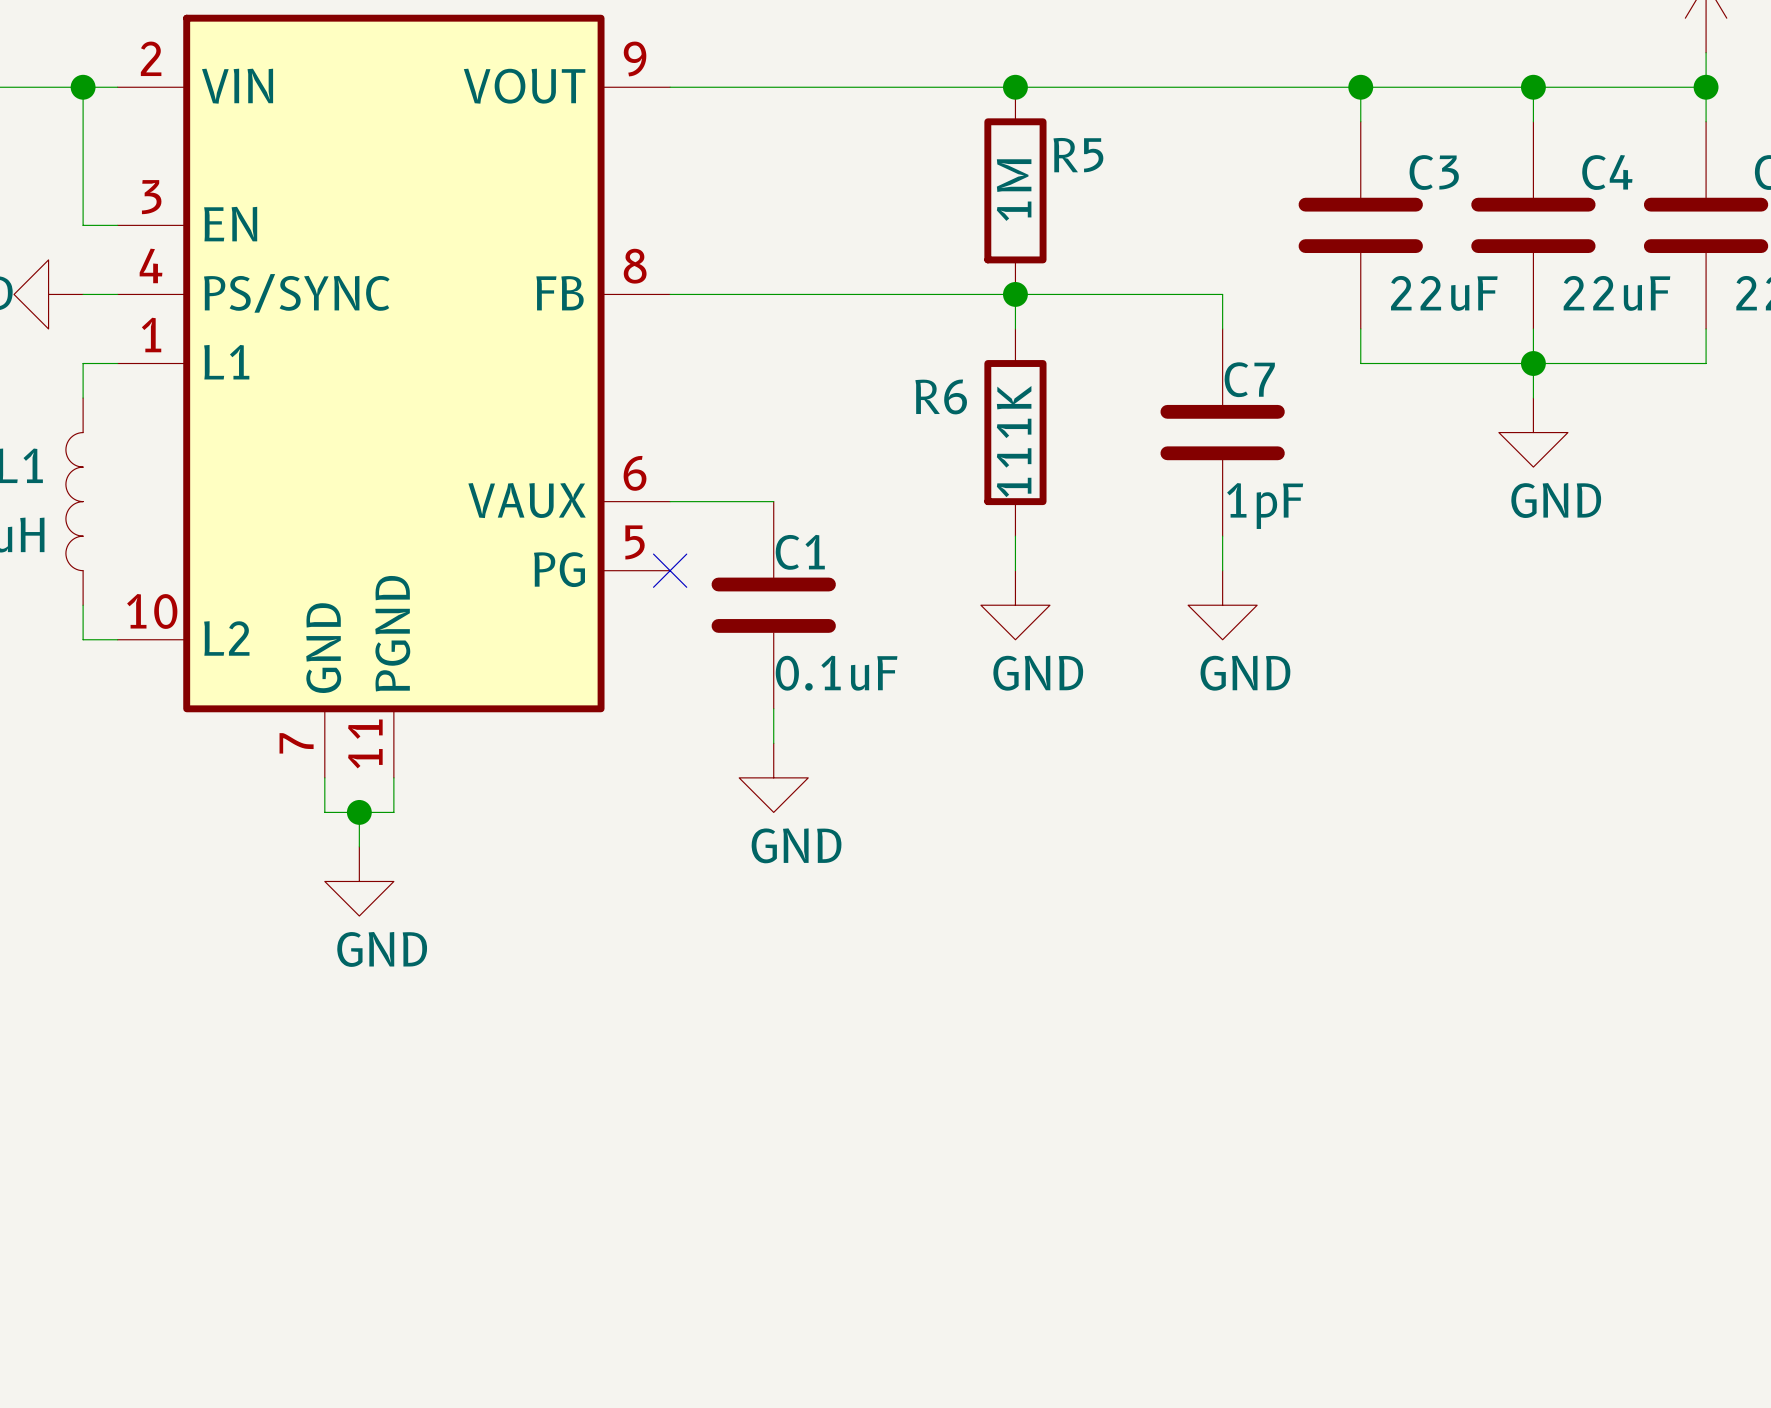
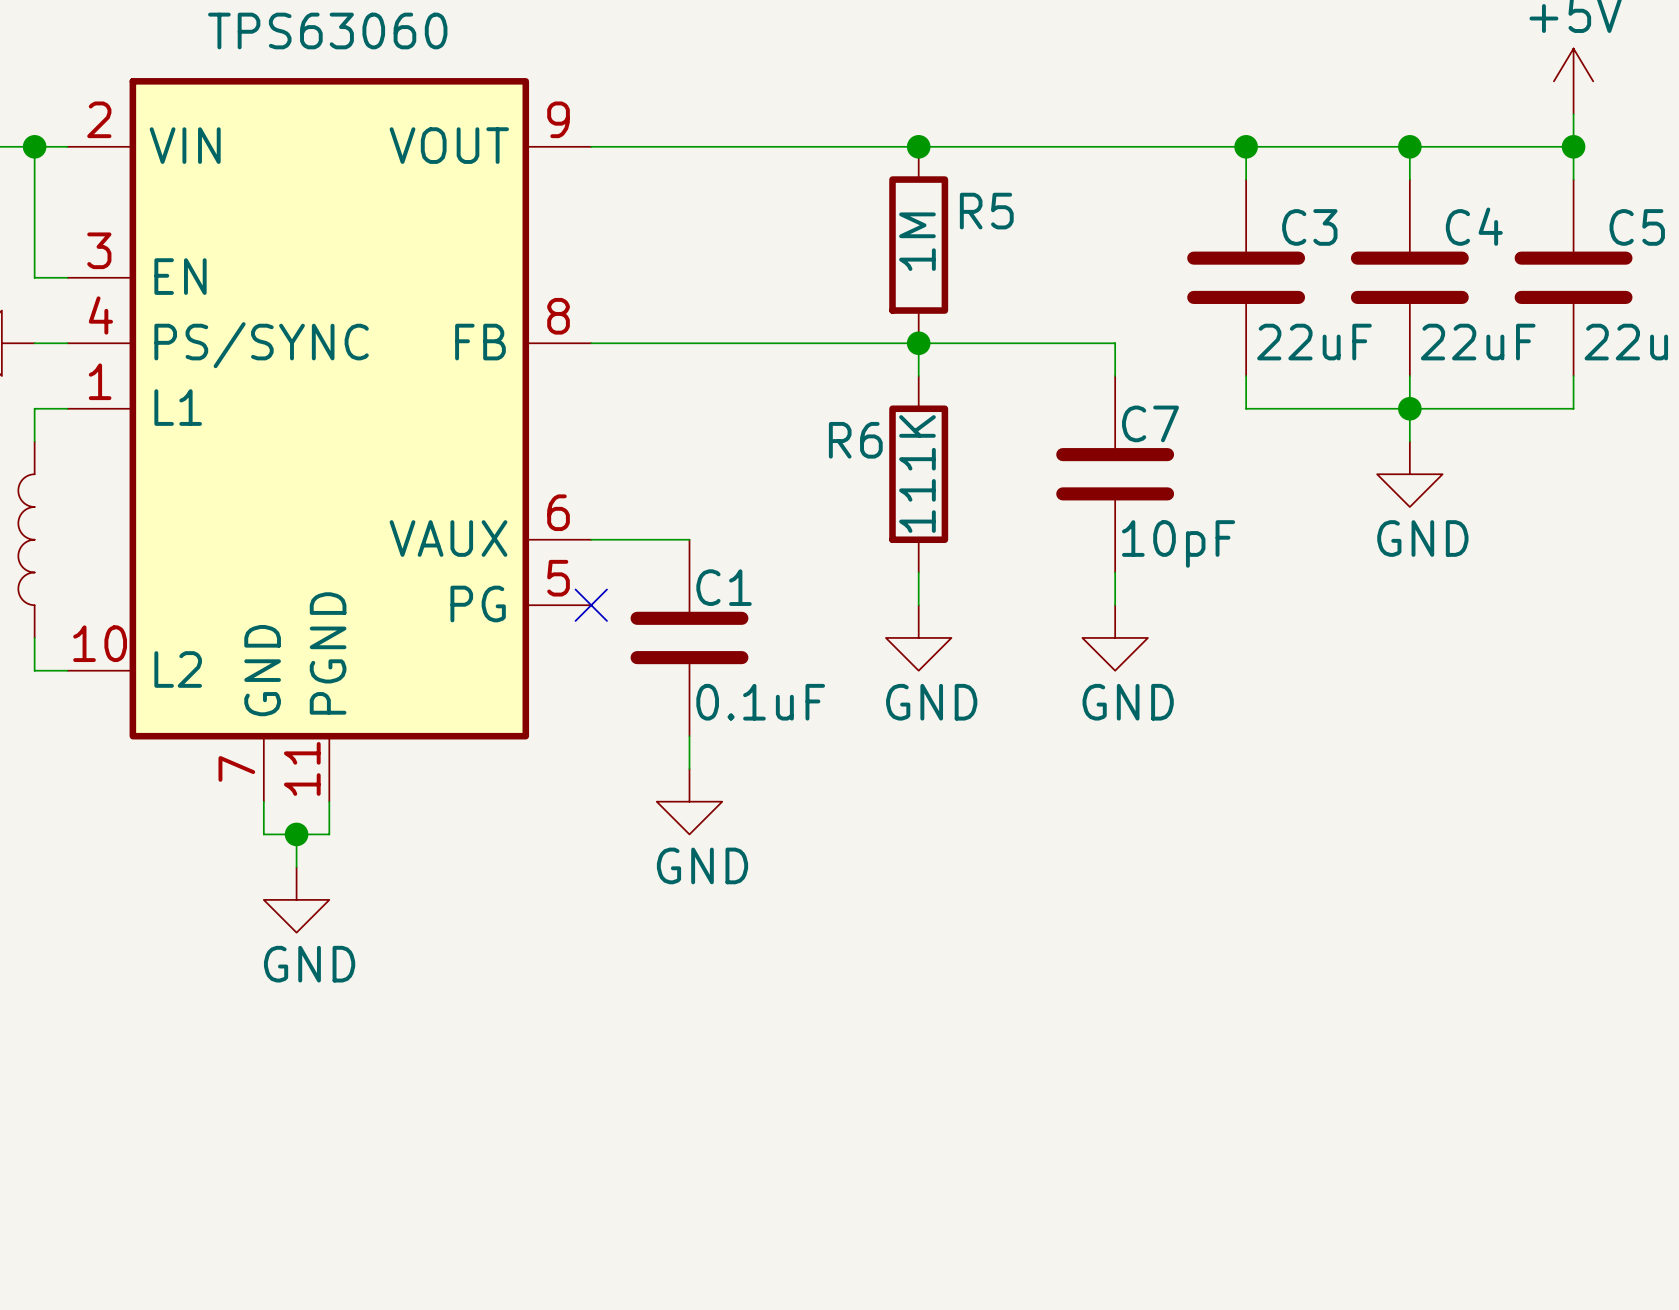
C7 value: 1pF (1265, 506) -> 10pF (1178, 543)

